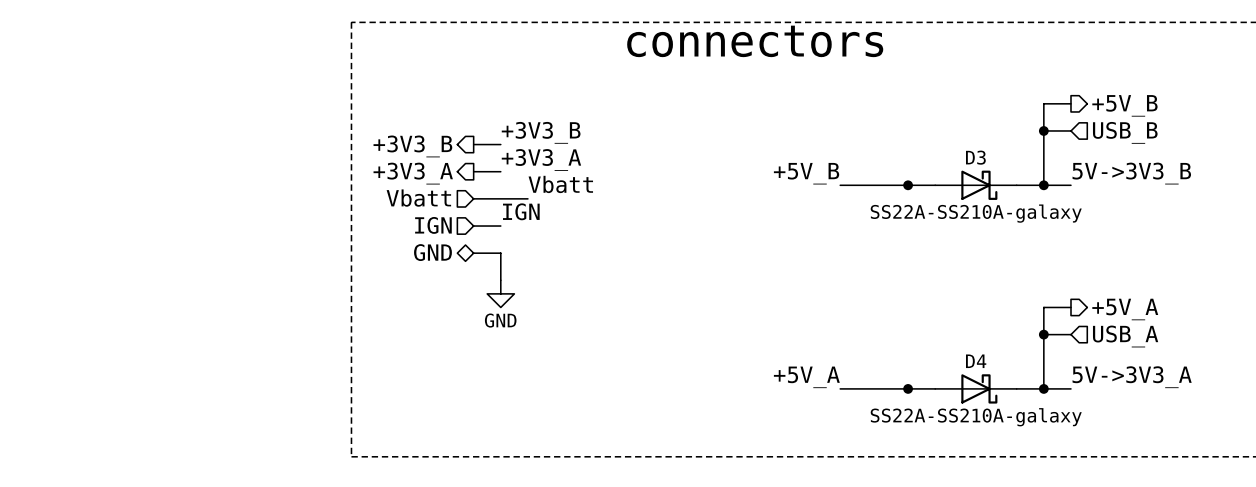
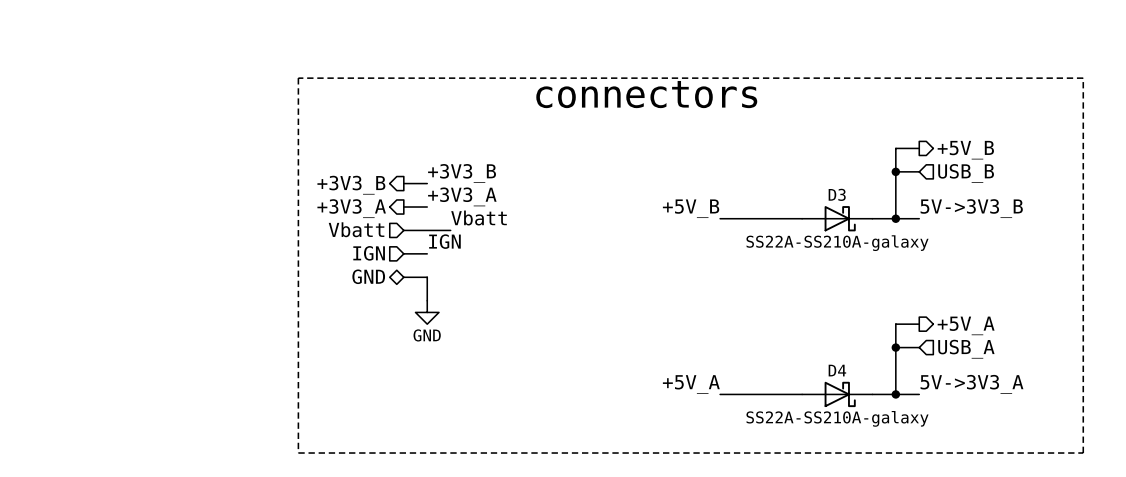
junction: (908, 185) -> none
junction: (908, 388) -> none

